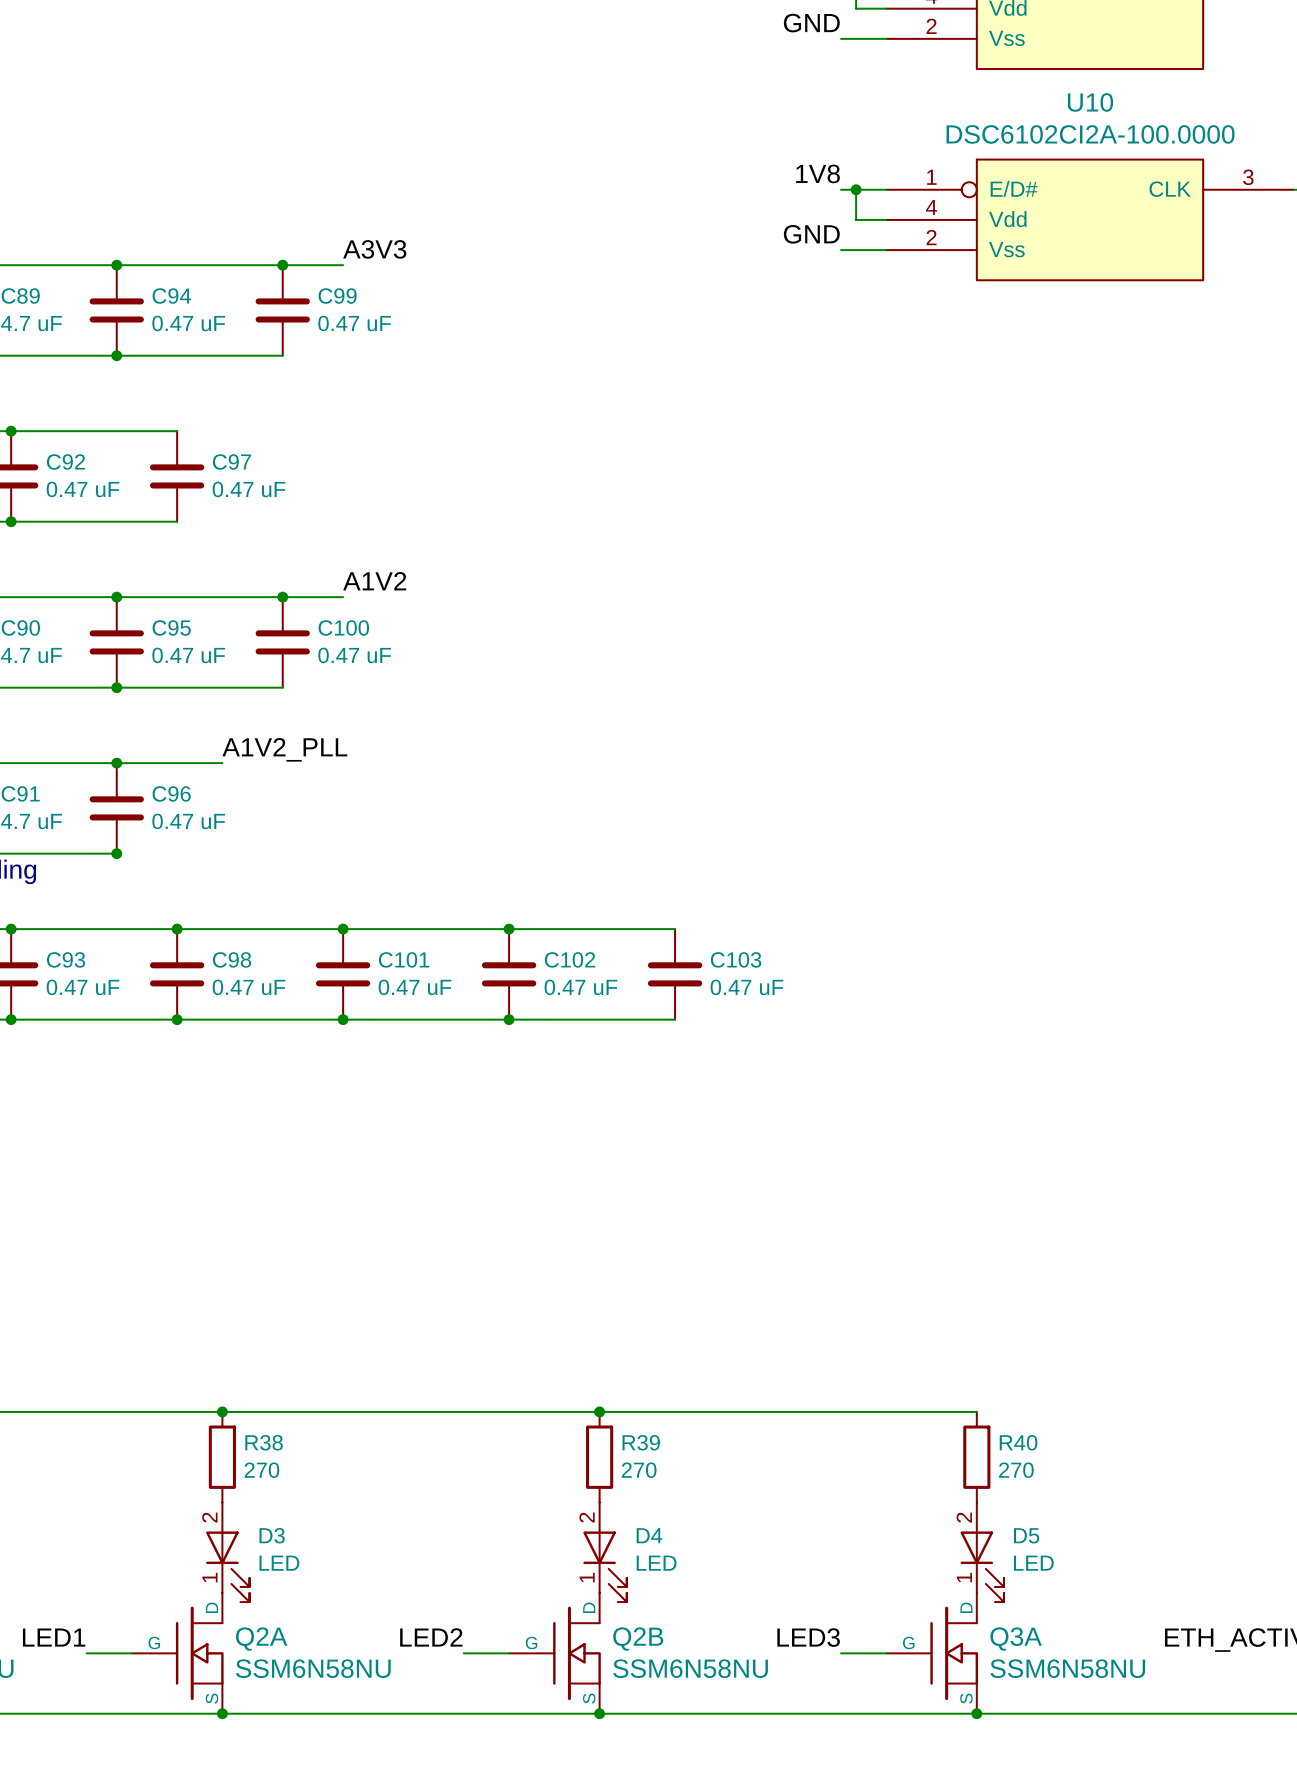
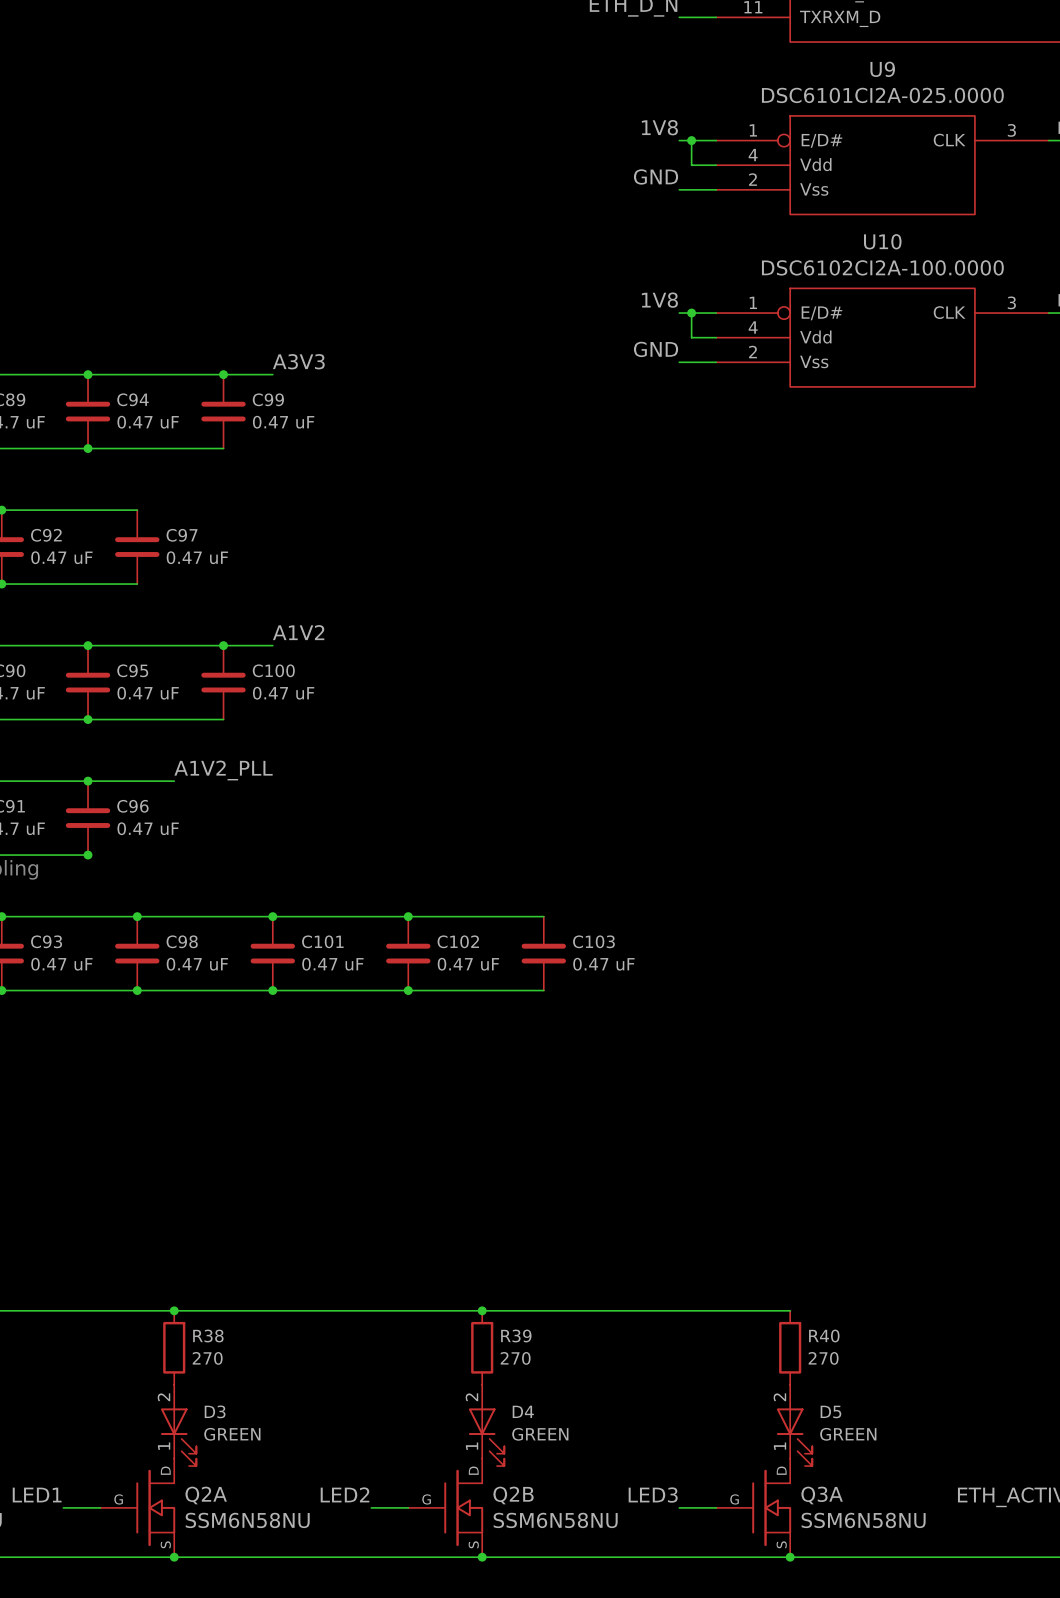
D3 value: LED (279, 1563) -> GREEN (232, 1434)
D4 value: LED (656, 1563) -> GREEN (540, 1434)
D5 value: LED (1033, 1563) -> GREEN (848, 1434)

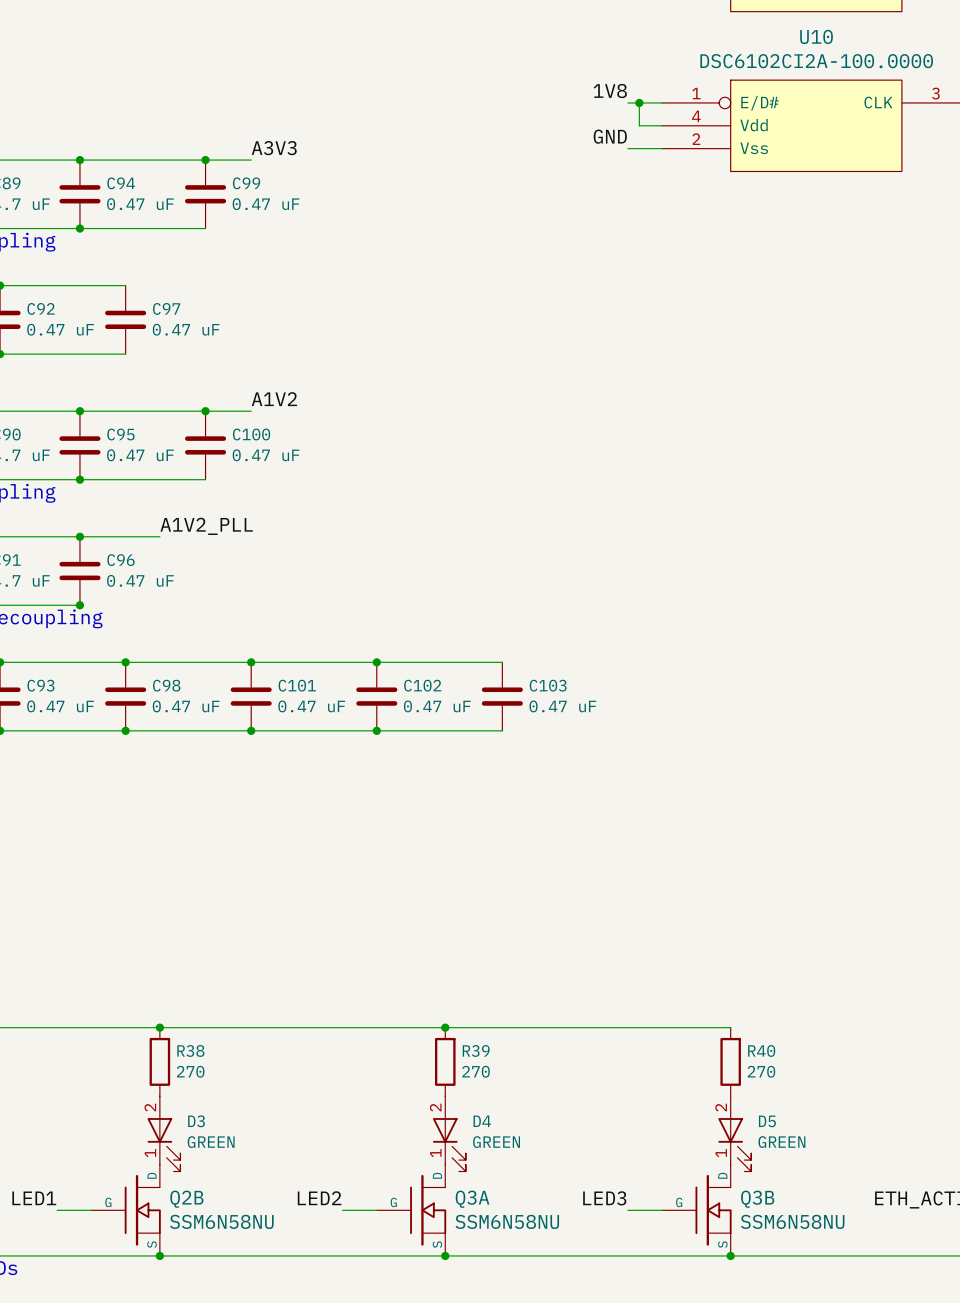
Q2A name: Q2A (206, 1495) -> Q2B (186, 1199)
Q2B name: Q2B (513, 1495) -> Q3A (472, 1199)
Q3A name: Q3A (822, 1495) -> Q3B (757, 1199)

